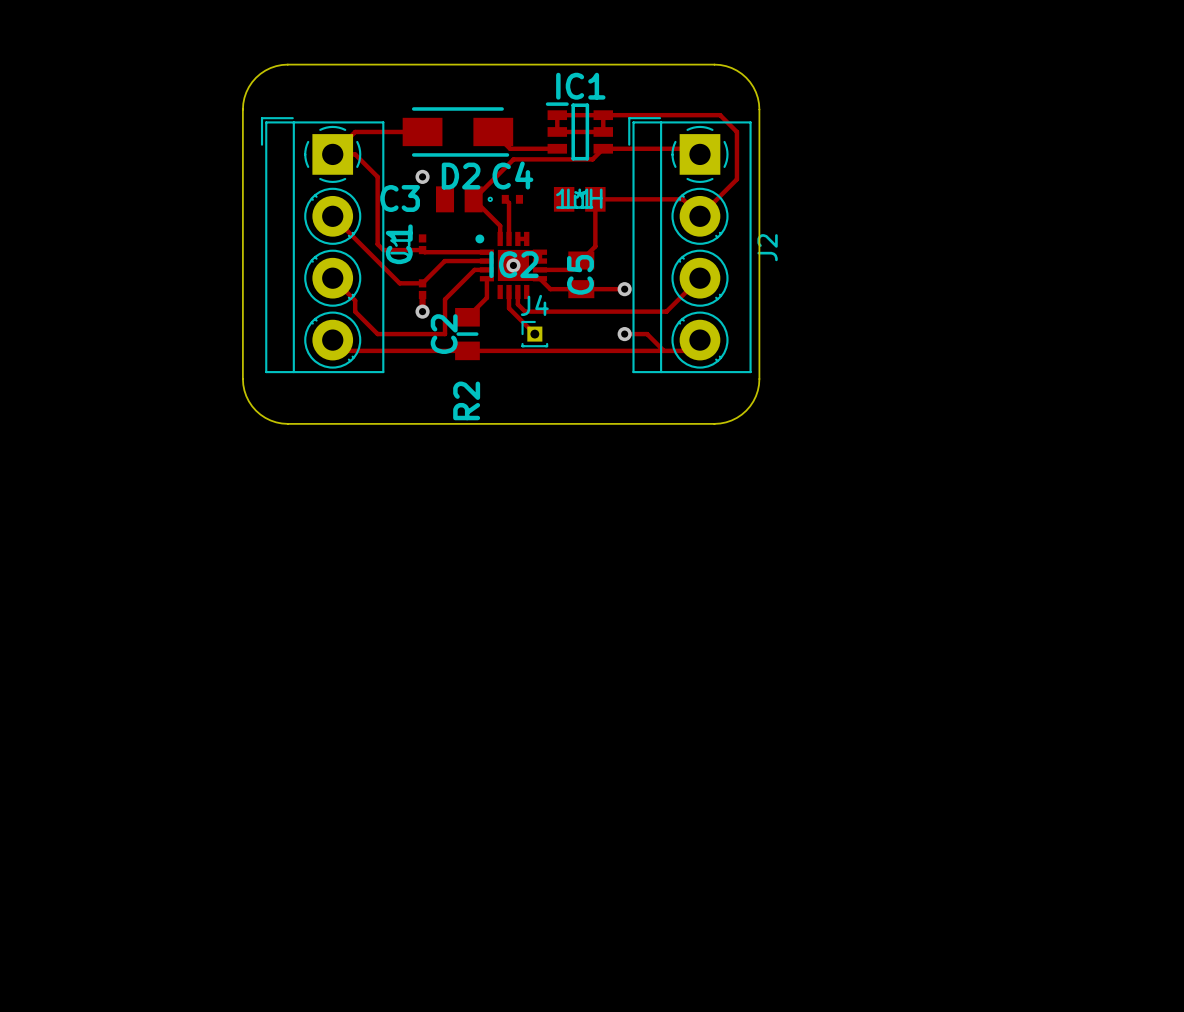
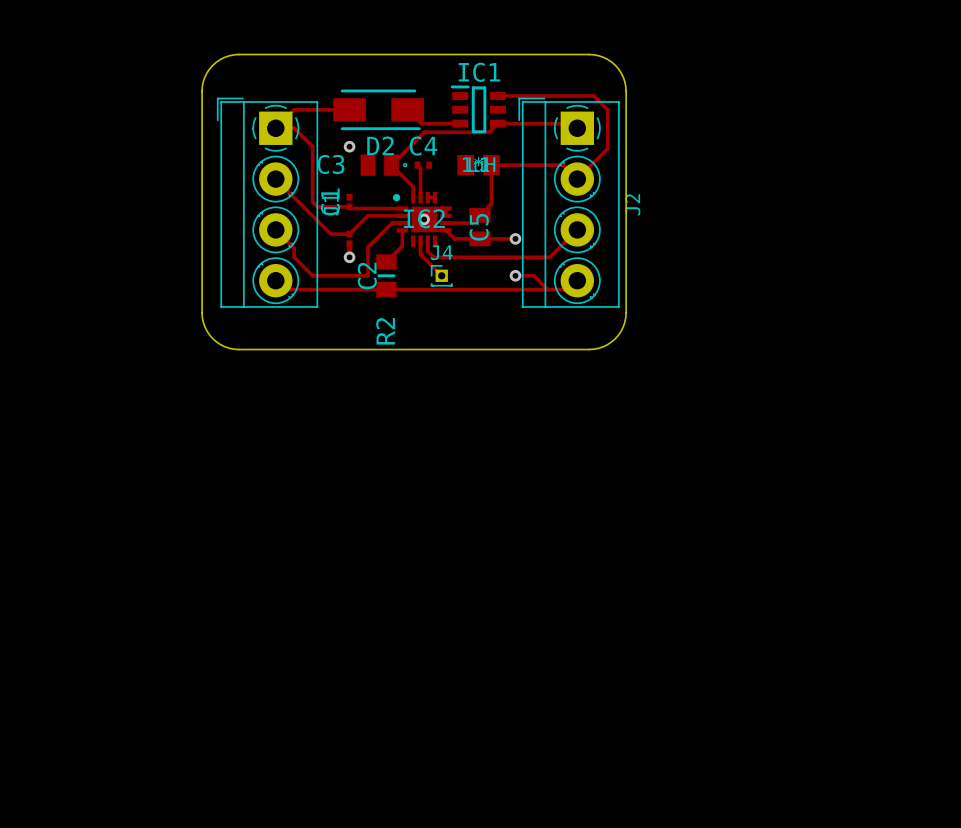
track: (557, 115) (603, 115) (603, 131) (557, 131) (557, 115) -> none

